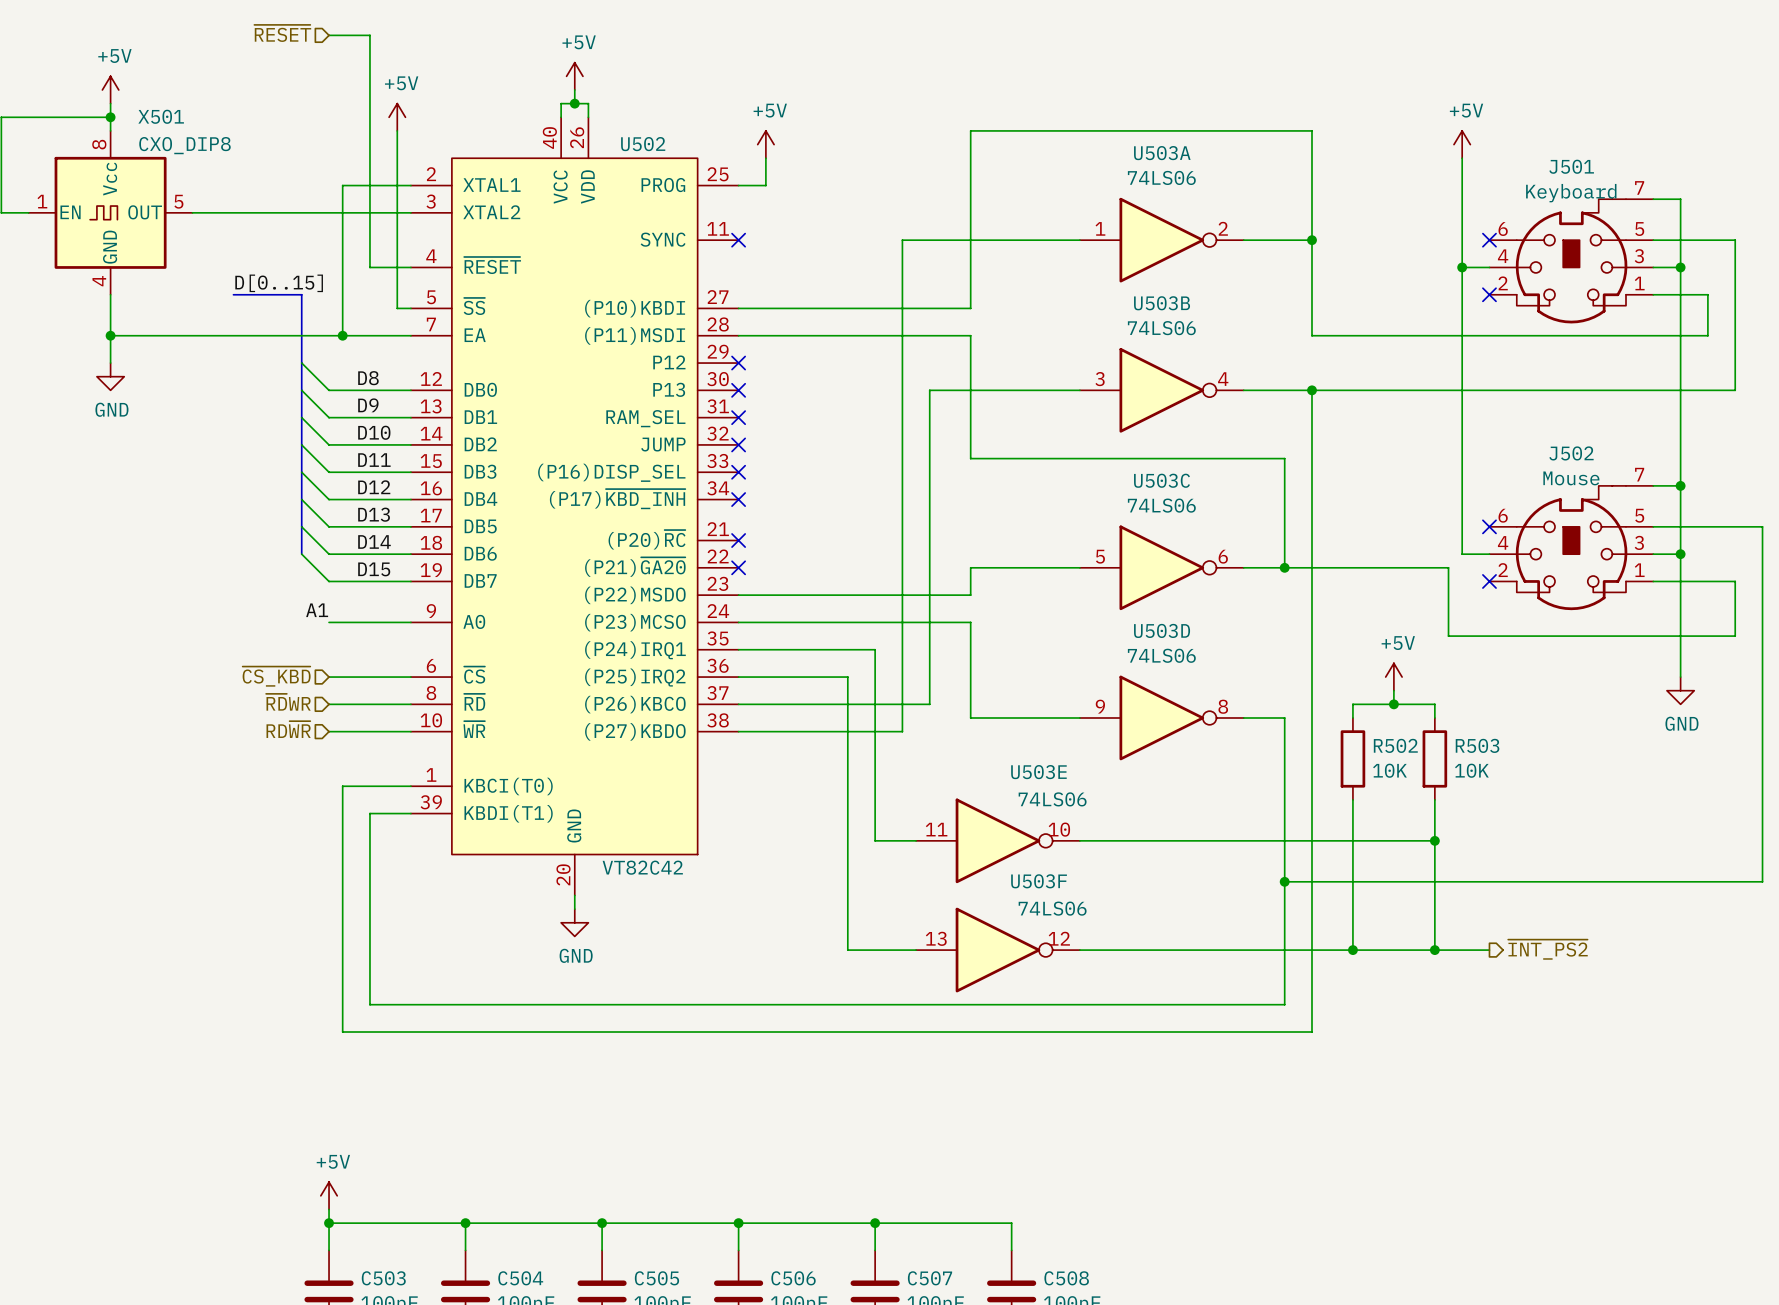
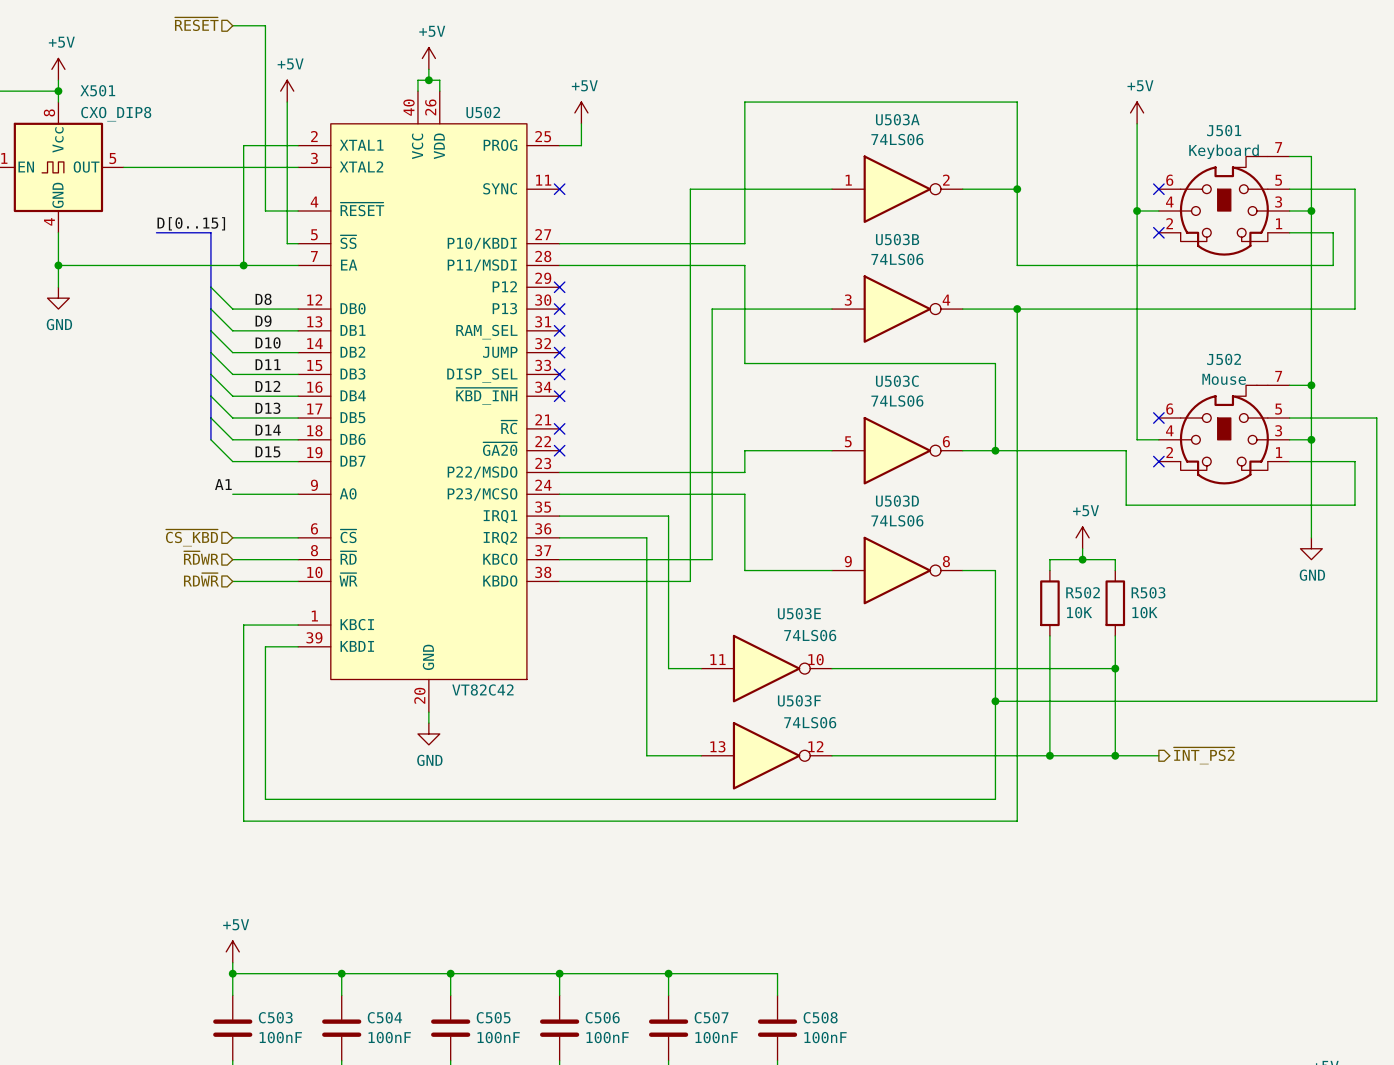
U502 symbol: [410, 117, 739, 896] -> [298, 91, 560, 713]

